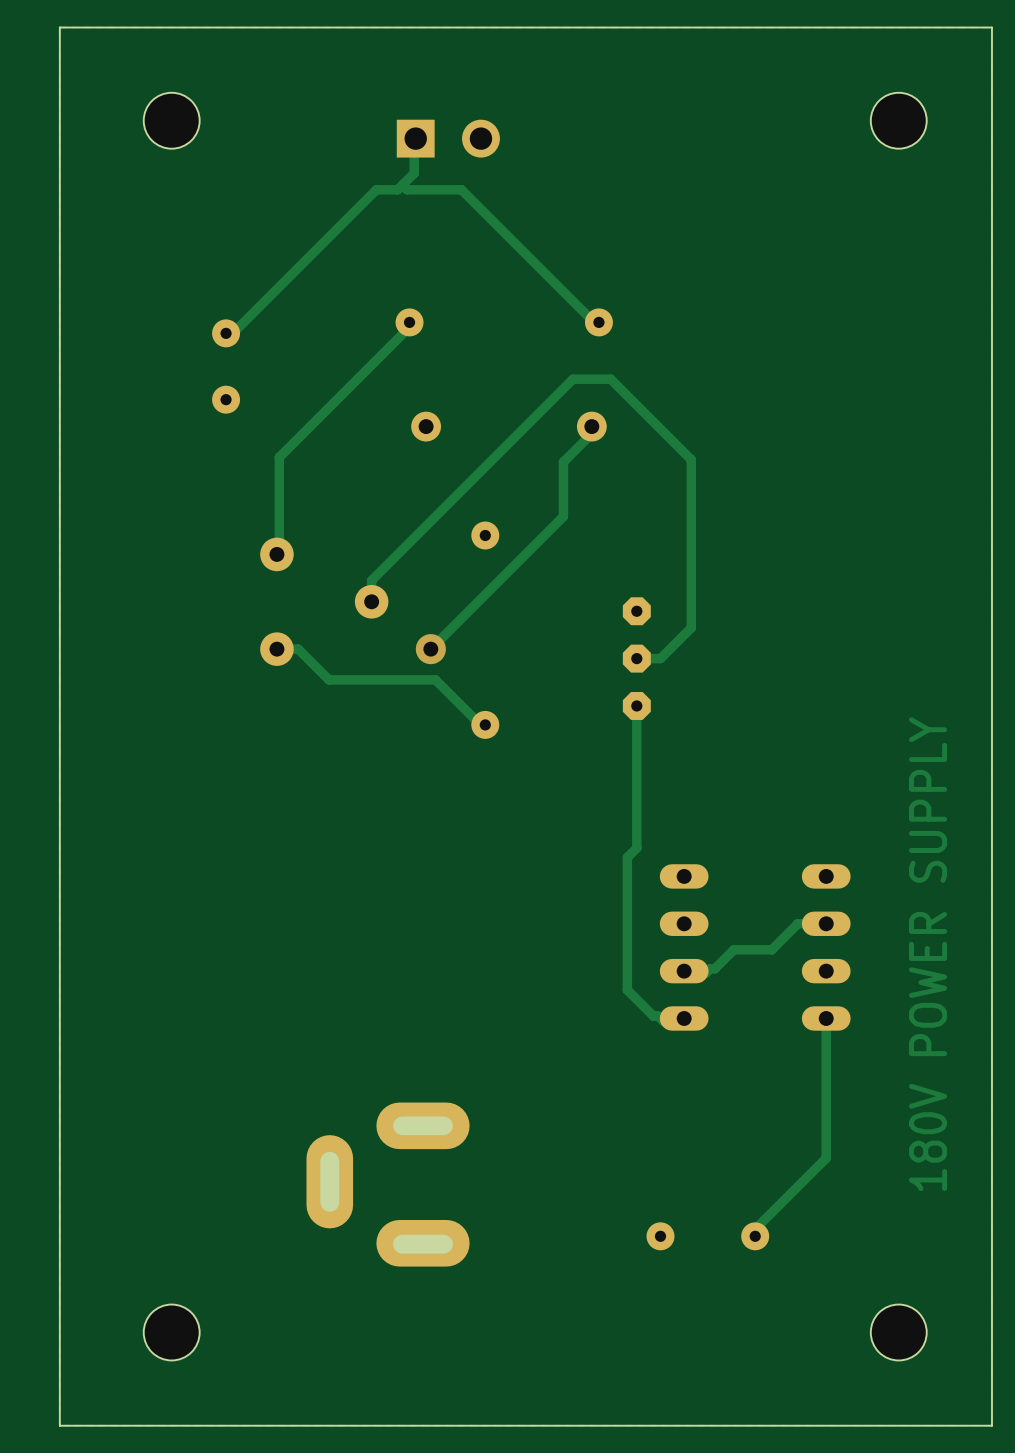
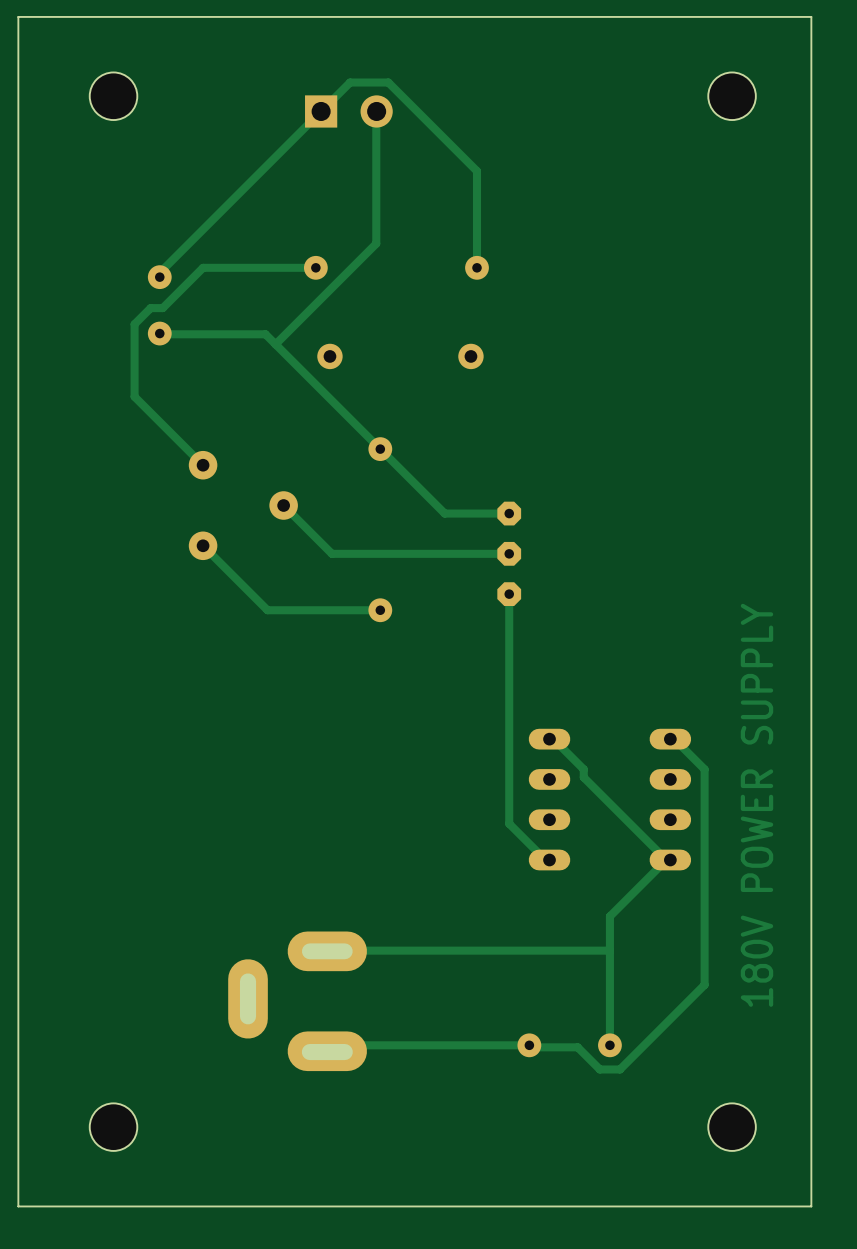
track: none -> (376, 111) (376, 243) (275, 344)
track: (414, 140) (414, 173) (397, 189) (376, 189) (234, 331) (227, 331) -> (319, 112) (160, 271) (160, 275)
track: (402, 185) (407, 189) (461, 189) (594, 322) (598, 322) -> (321, 111) (350, 82) (388, 82) (477, 171) (477, 267)
track: (409, 322) (409, 327) (279, 457) (279, 552) (276, 554) -> (315, 267) (203, 267) (162, 308) (150, 308) (134, 324) (134, 396) (203, 465)
track: none -> (159, 333) (265, 334) (444, 513) (509, 513)
track: (591, 426) (591, 433) (563, 462) (563, 516) (430, 649) -> none
track: (371, 601) (371, 580) (572, 379) (610, 379) (691, 459) (691, 627) (660, 658) (636, 658) -> (283, 505) (331, 553) (509, 553)
track: (276, 649) (298, 649) (329, 679) (435, 679) (480, 724) -> (203, 545) (267, 610) (376, 610)
via: (430, 649) -> none
track: (636, 848) (627, 857) (627, 990) (653, 1016) (658, 1016) (662, 1020) (681, 1020) (684, 1018) -> (509, 714) (509, 823) (545, 860) (549, 860)
track: none -> (670, 739) (674, 739) (704, 769) (704, 984) (620, 1069) (599, 1069) (577, 1047) (531, 1047) (529, 1045) (331, 1045) (327, 1051)
track: (826, 923) (797, 923) (771, 949) (733, 949) (714, 968) (710, 968) (705, 973) (686, 973) (684, 971) -> none
track: (826, 1018) (826, 1158) (755, 1229) -> (549, 739) (553, 739) (583, 769) (583, 777) (666, 860) (670, 860) (664, 862) (609, 916) (609, 1039)
track: none -> (609, 950) (327, 951)

